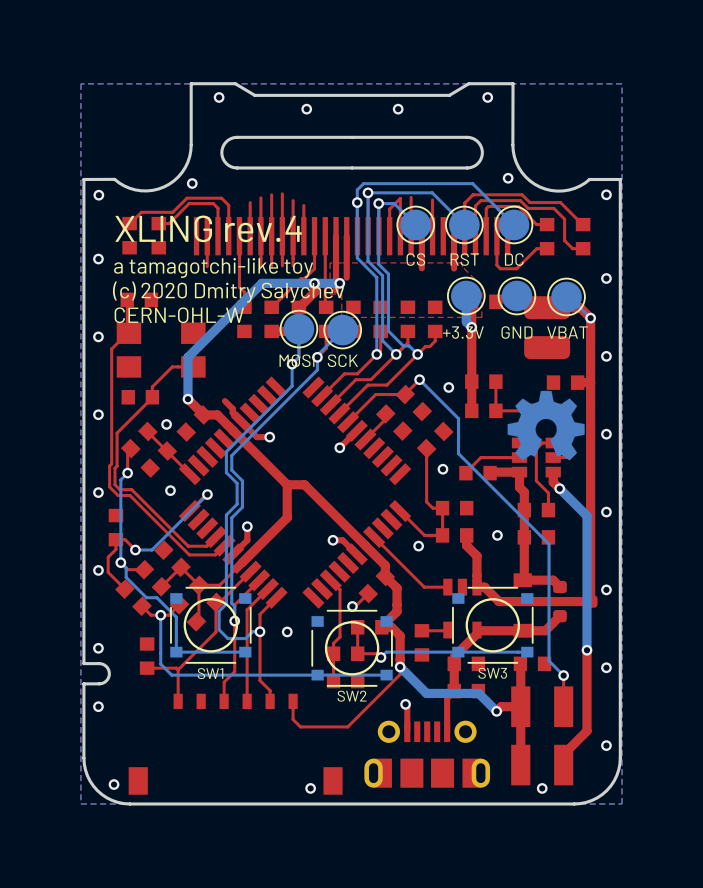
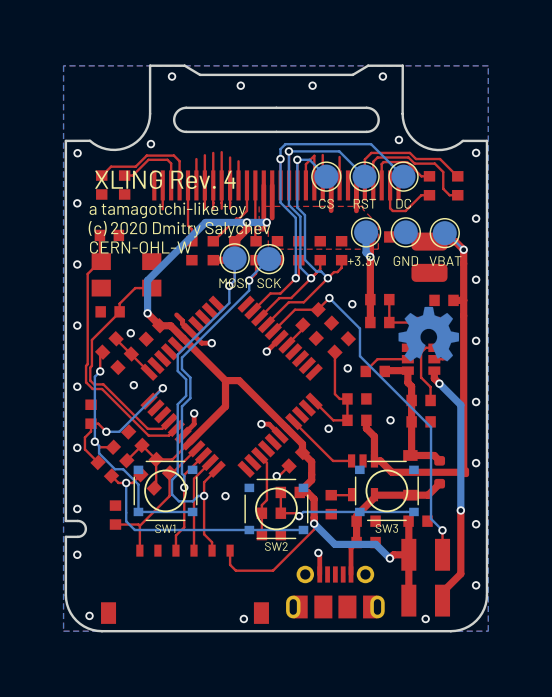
text: XLING rev.4 (208, 228) -> XLING Rev. 4 (165, 179)

